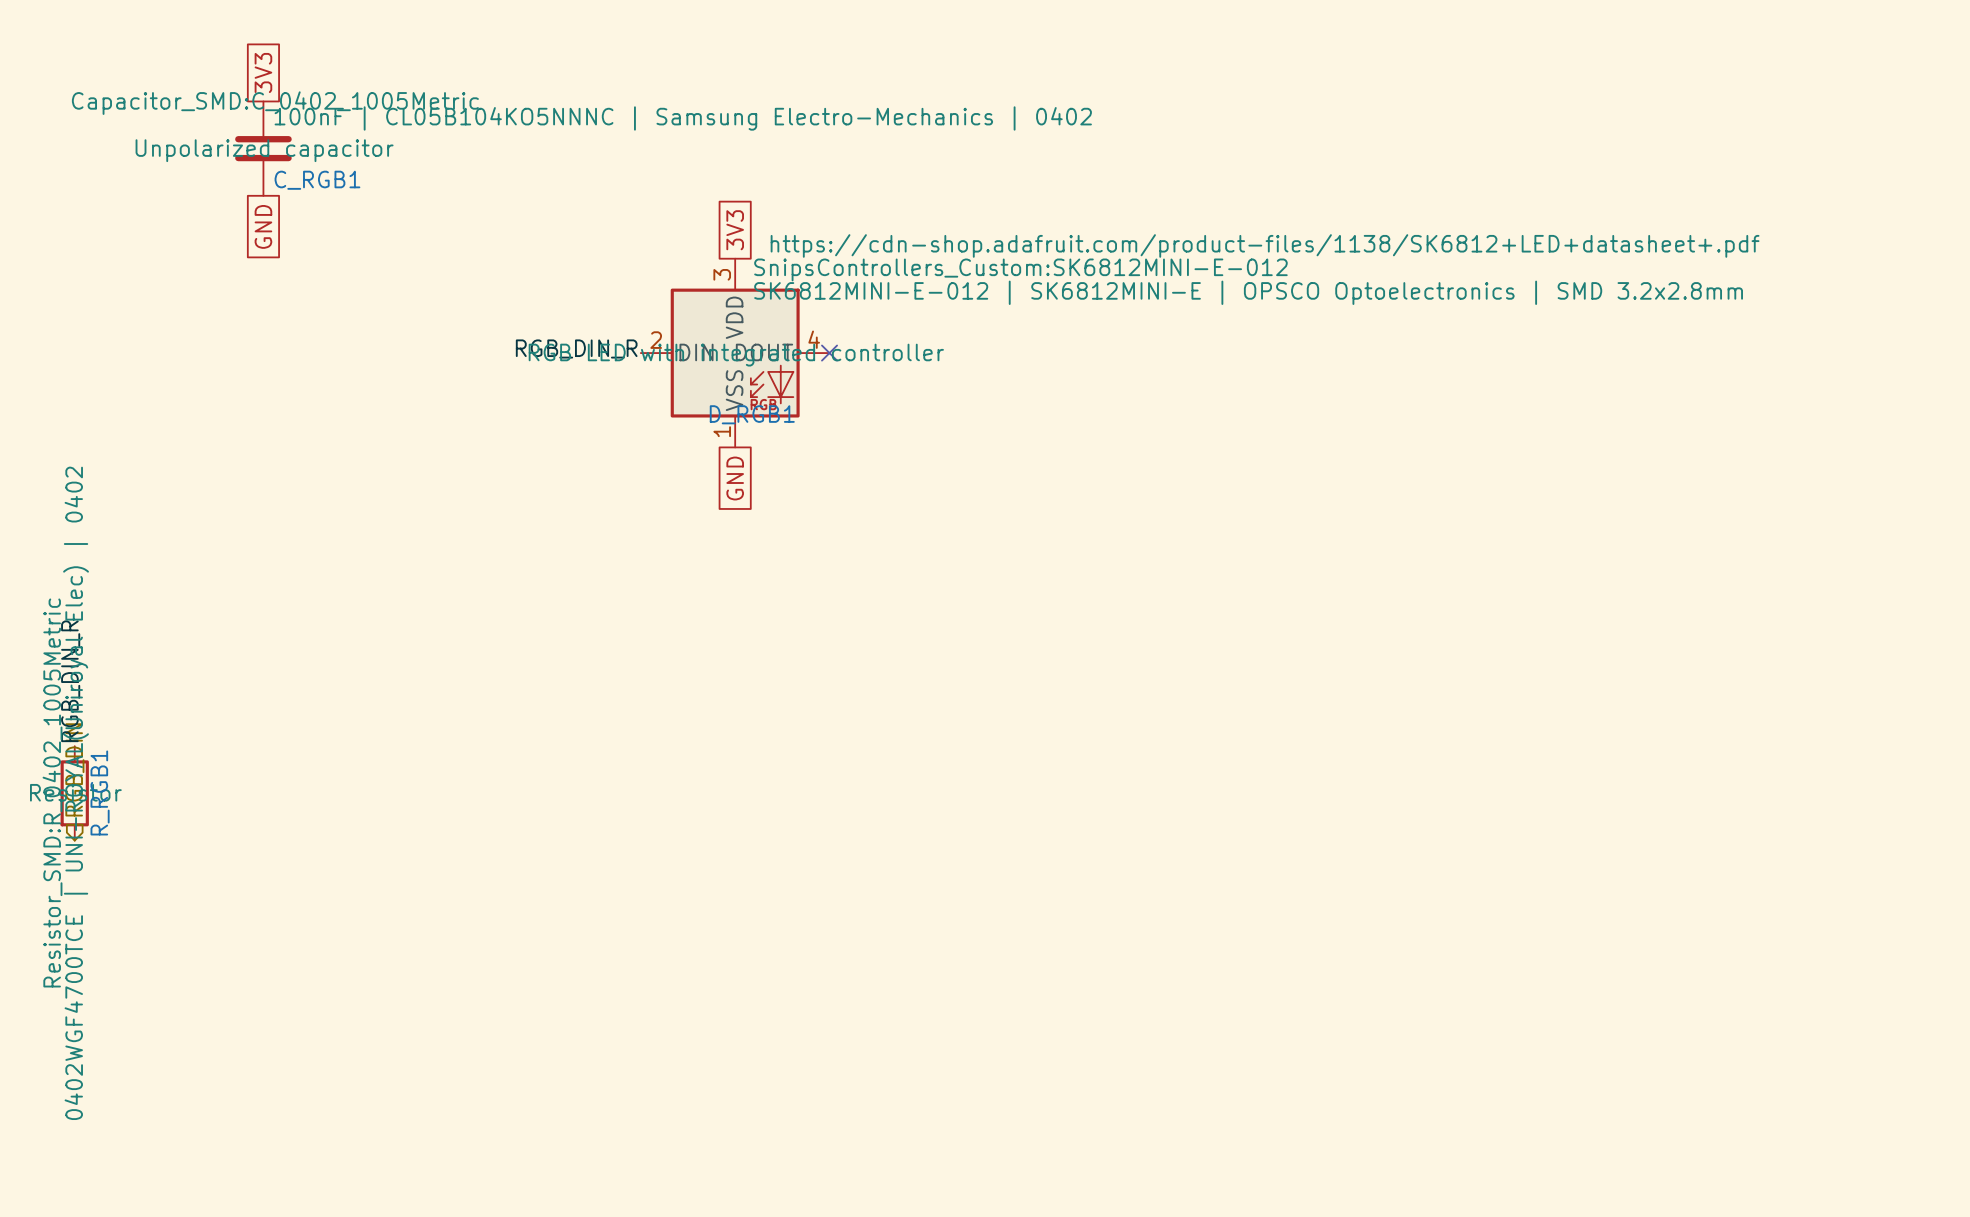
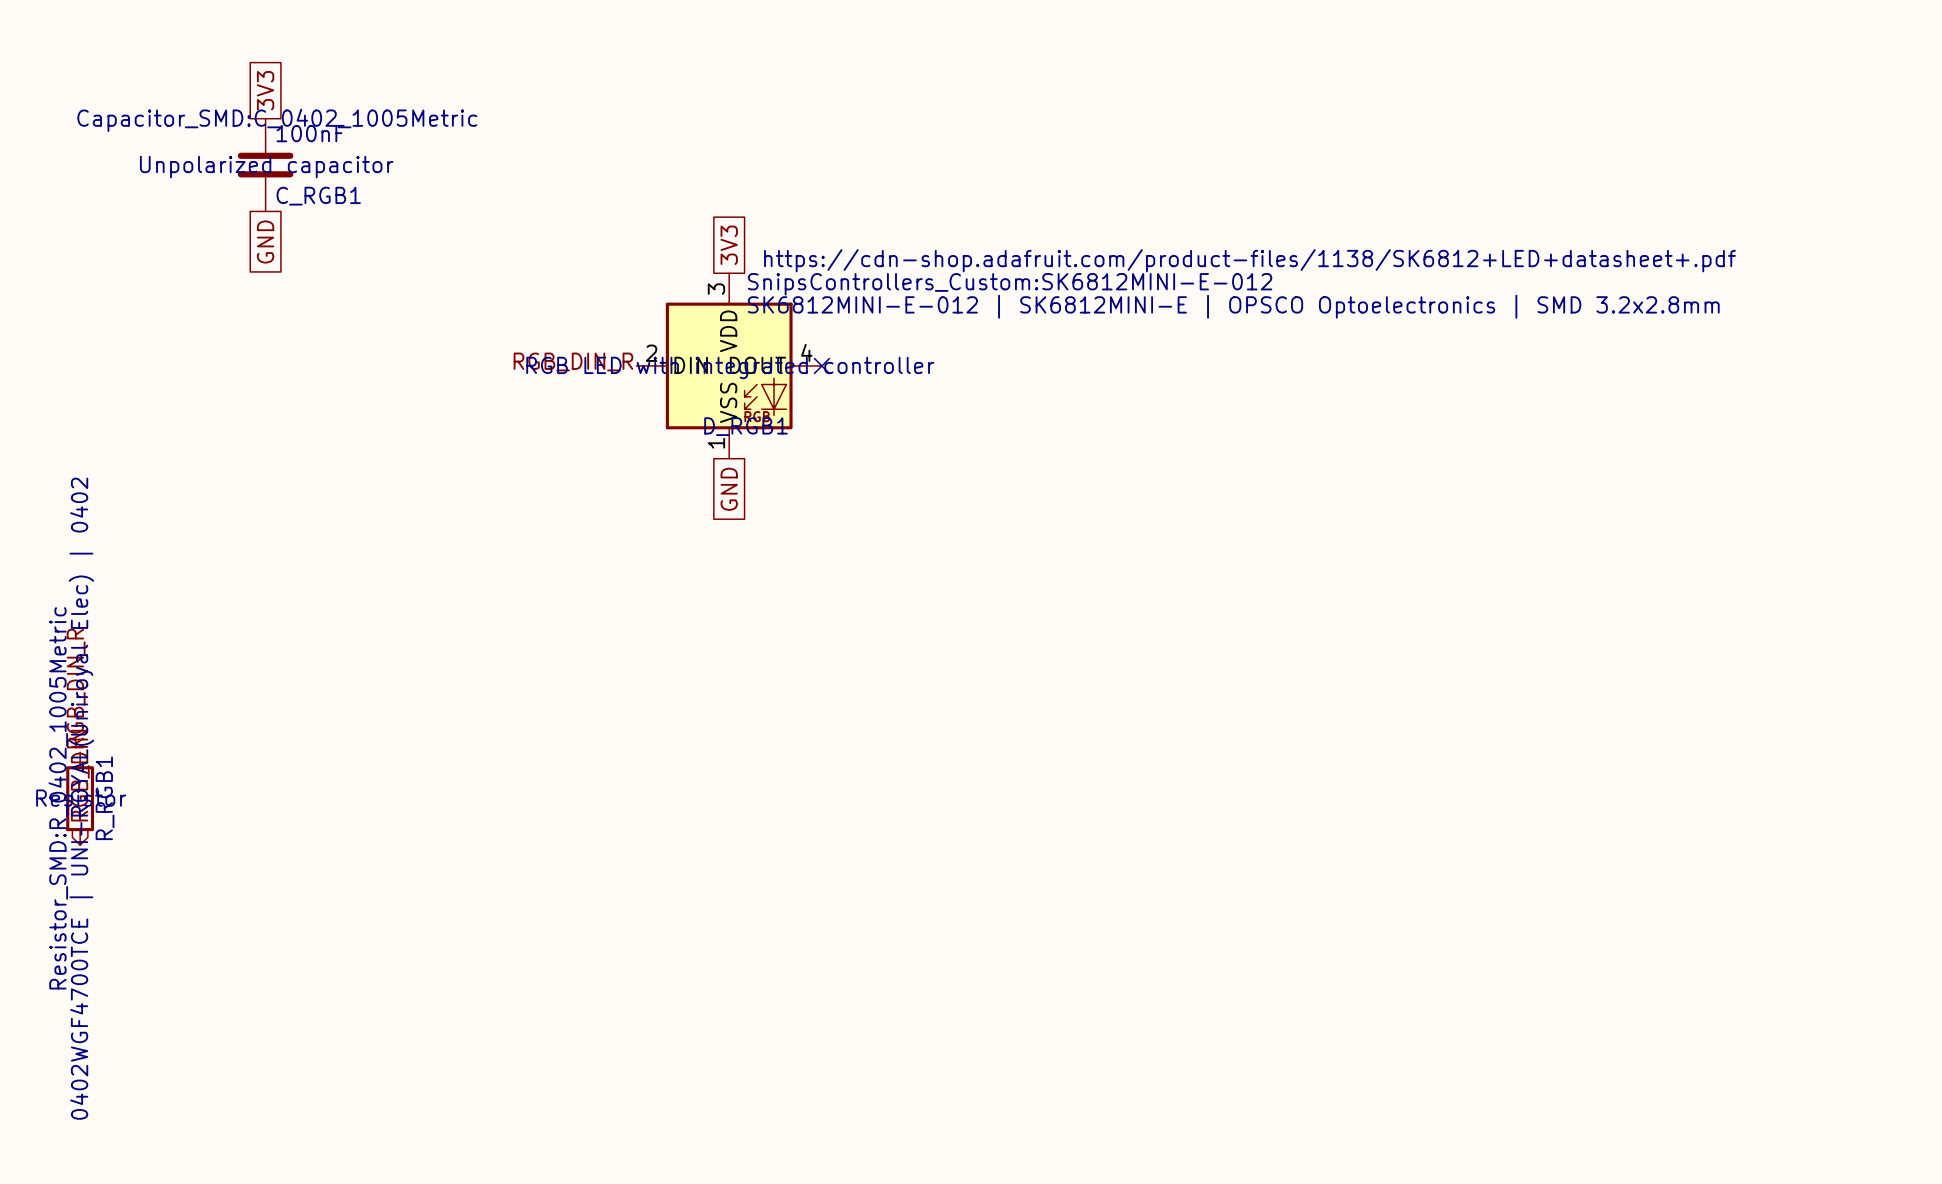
C_RGB1 value: 100nF | CL05B104KO5NNNC | Samsung Electro-Mechanics | 0402 (683, 118) -> 100nF (310, 133)

